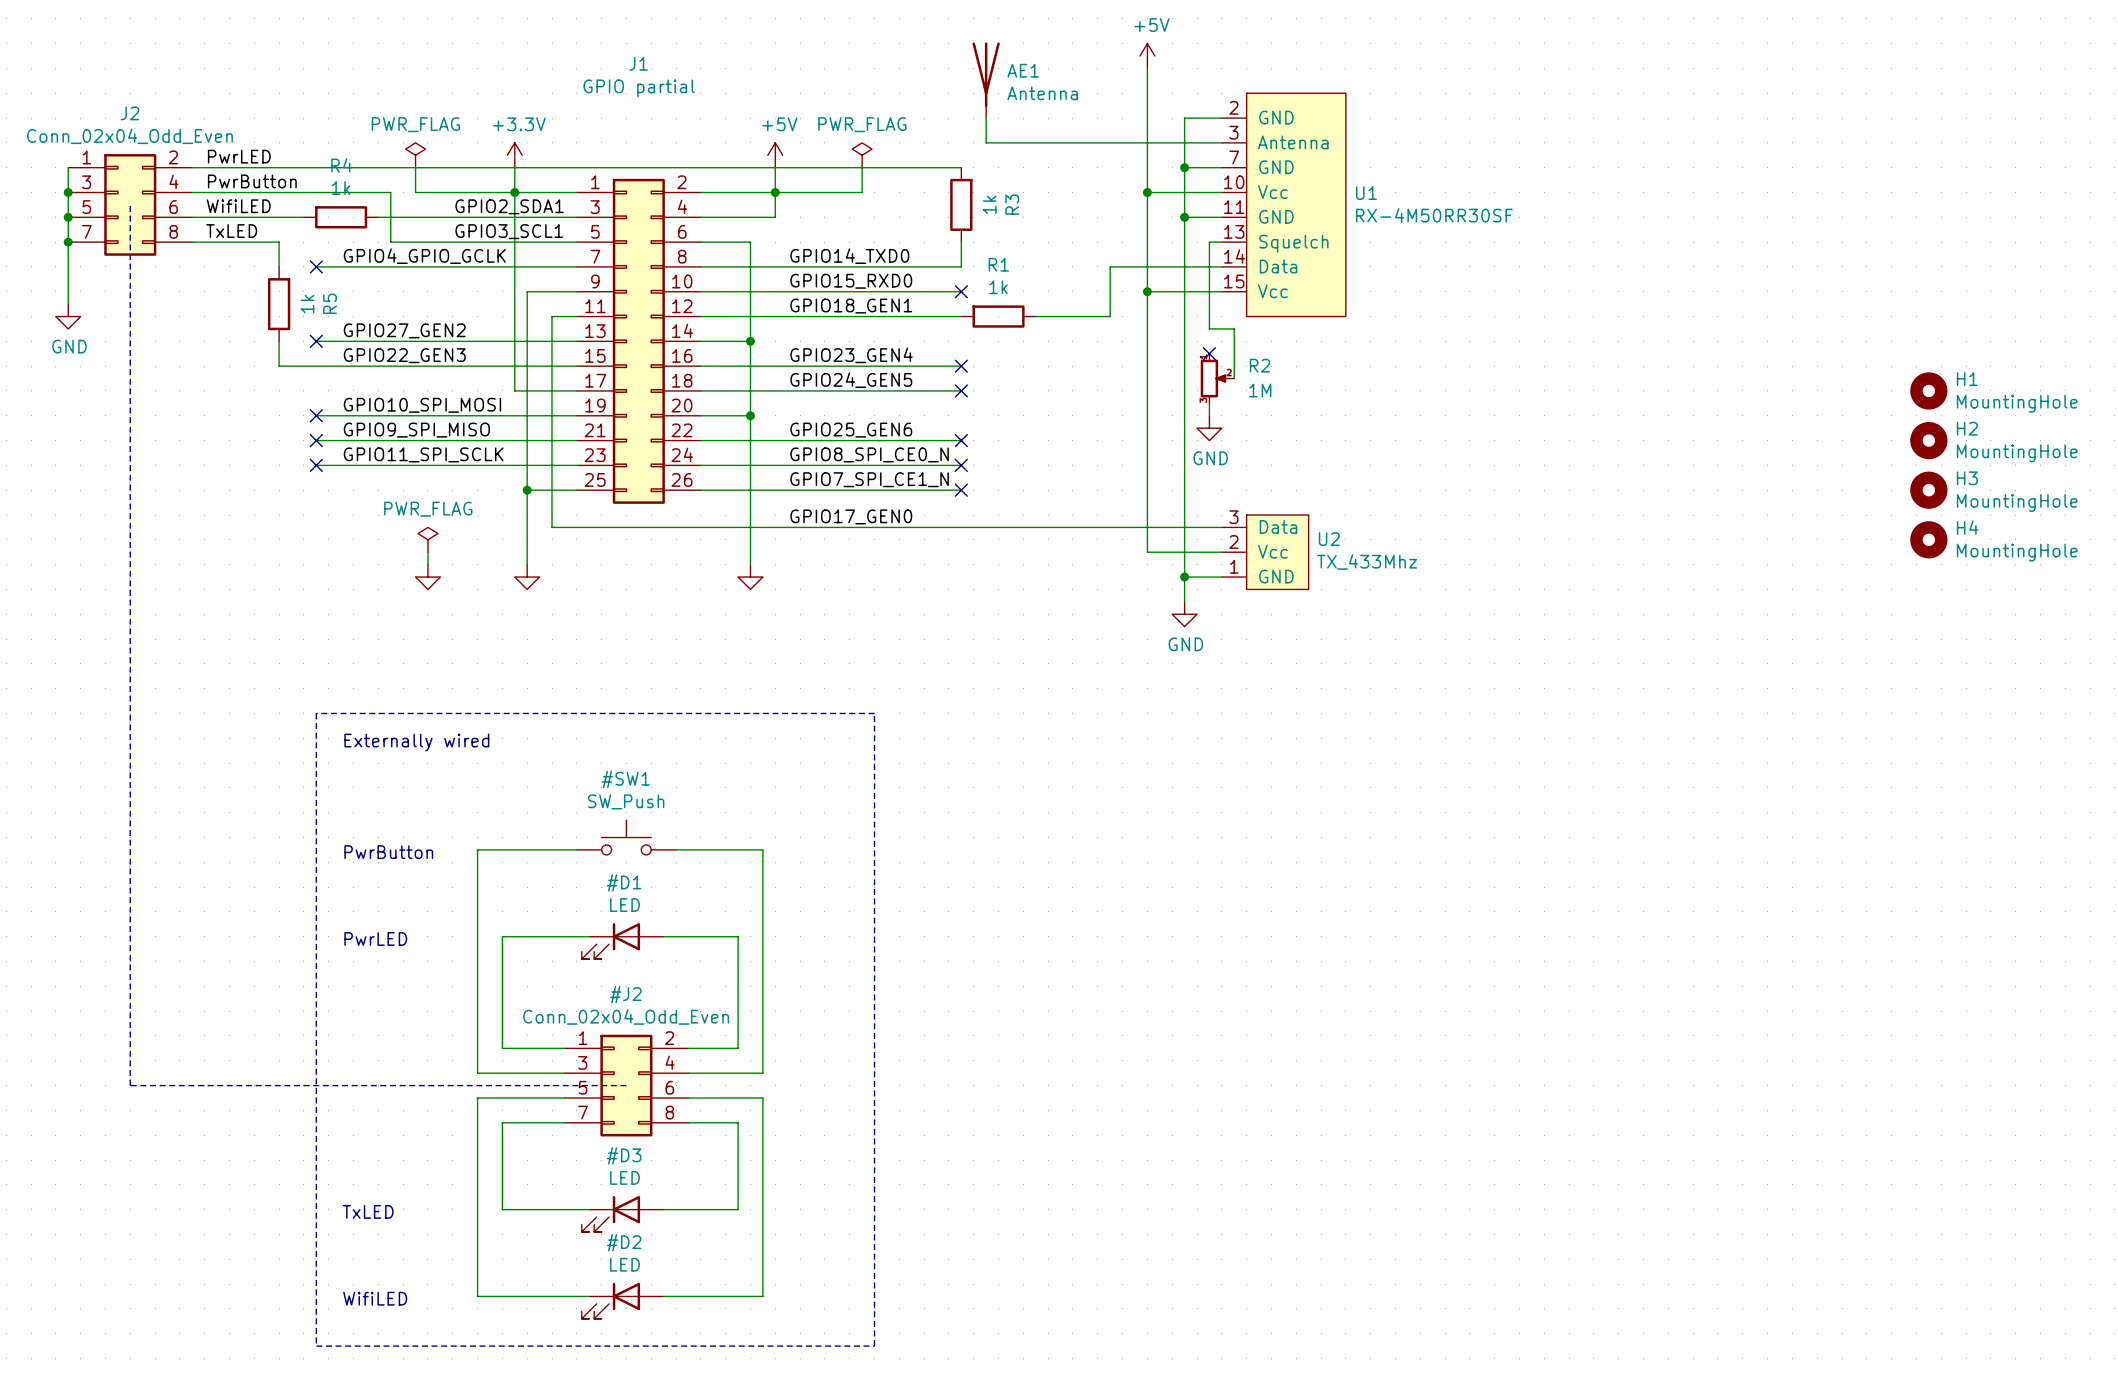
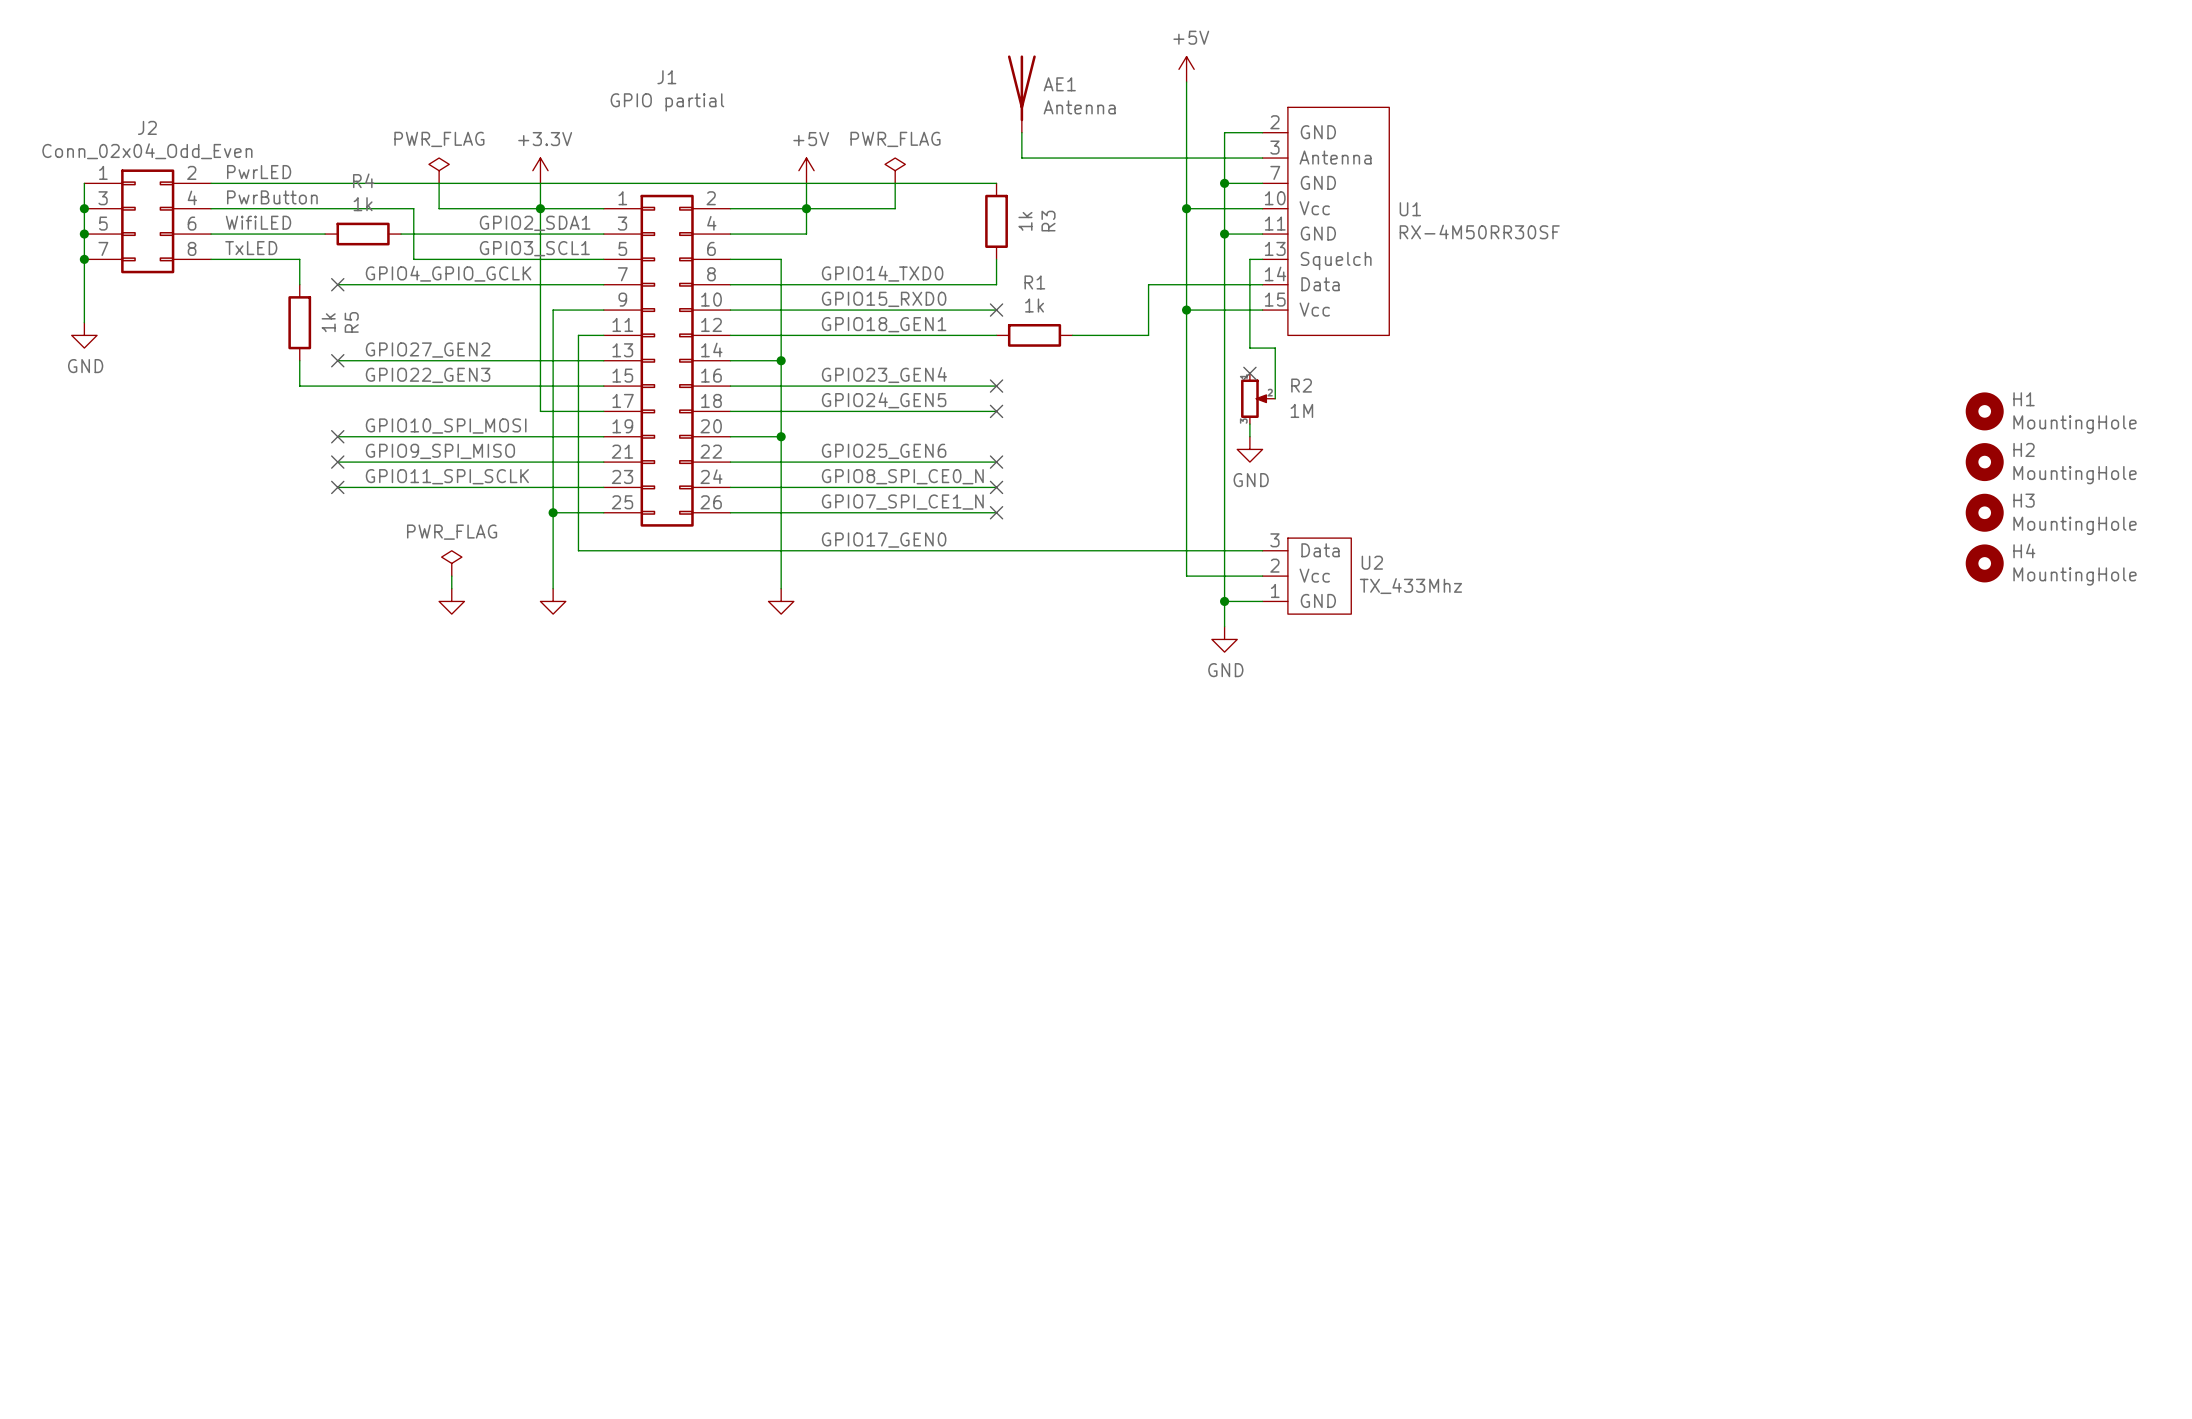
line: (130, 204) (130, 1085) (626, 1085) -> none
line: (316, 713) (316, 1346) (874, 1346) (874, 713) (316, 713) -> none
text: Externally wired (416, 742) -> none
#SW1: SW_Push (626, 837) -> none
wire: (576, 849) (477, 849) (477, 1073) (564, 1073) -> none
wire: (676, 849) (762, 849) (762, 1073) (688, 1073) -> none
text: PwrButton (388, 852) -> none
wire: (589, 936) (502, 936) (502, 1048) (564, 1048) -> none
wire: (663, 936) (738, 936) (738, 1048) (688, 1048) -> none
text: PwrLED (375, 938) -> none
#D1: LED (622, 941) -> none
#J2: Conn_02x04_Odd_Even (626, 1085) -> none
wire: (564, 1097) (477, 1097) (477, 1296) (589, 1296) -> none
wire: (688, 1097) (762, 1097) (762, 1296) (663, 1296) -> none
wire: (564, 1122) (502, 1122) (502, 1209) (589, 1209) -> none
wire: (688, 1122) (738, 1122) (738, 1209) (663, 1209) -> none
text: TxLED (368, 1211) -> none
#D3: LED (622, 1213) -> none
text: WifiLED (375, 1298) -> none
#D2: LED (622, 1300) -> none

